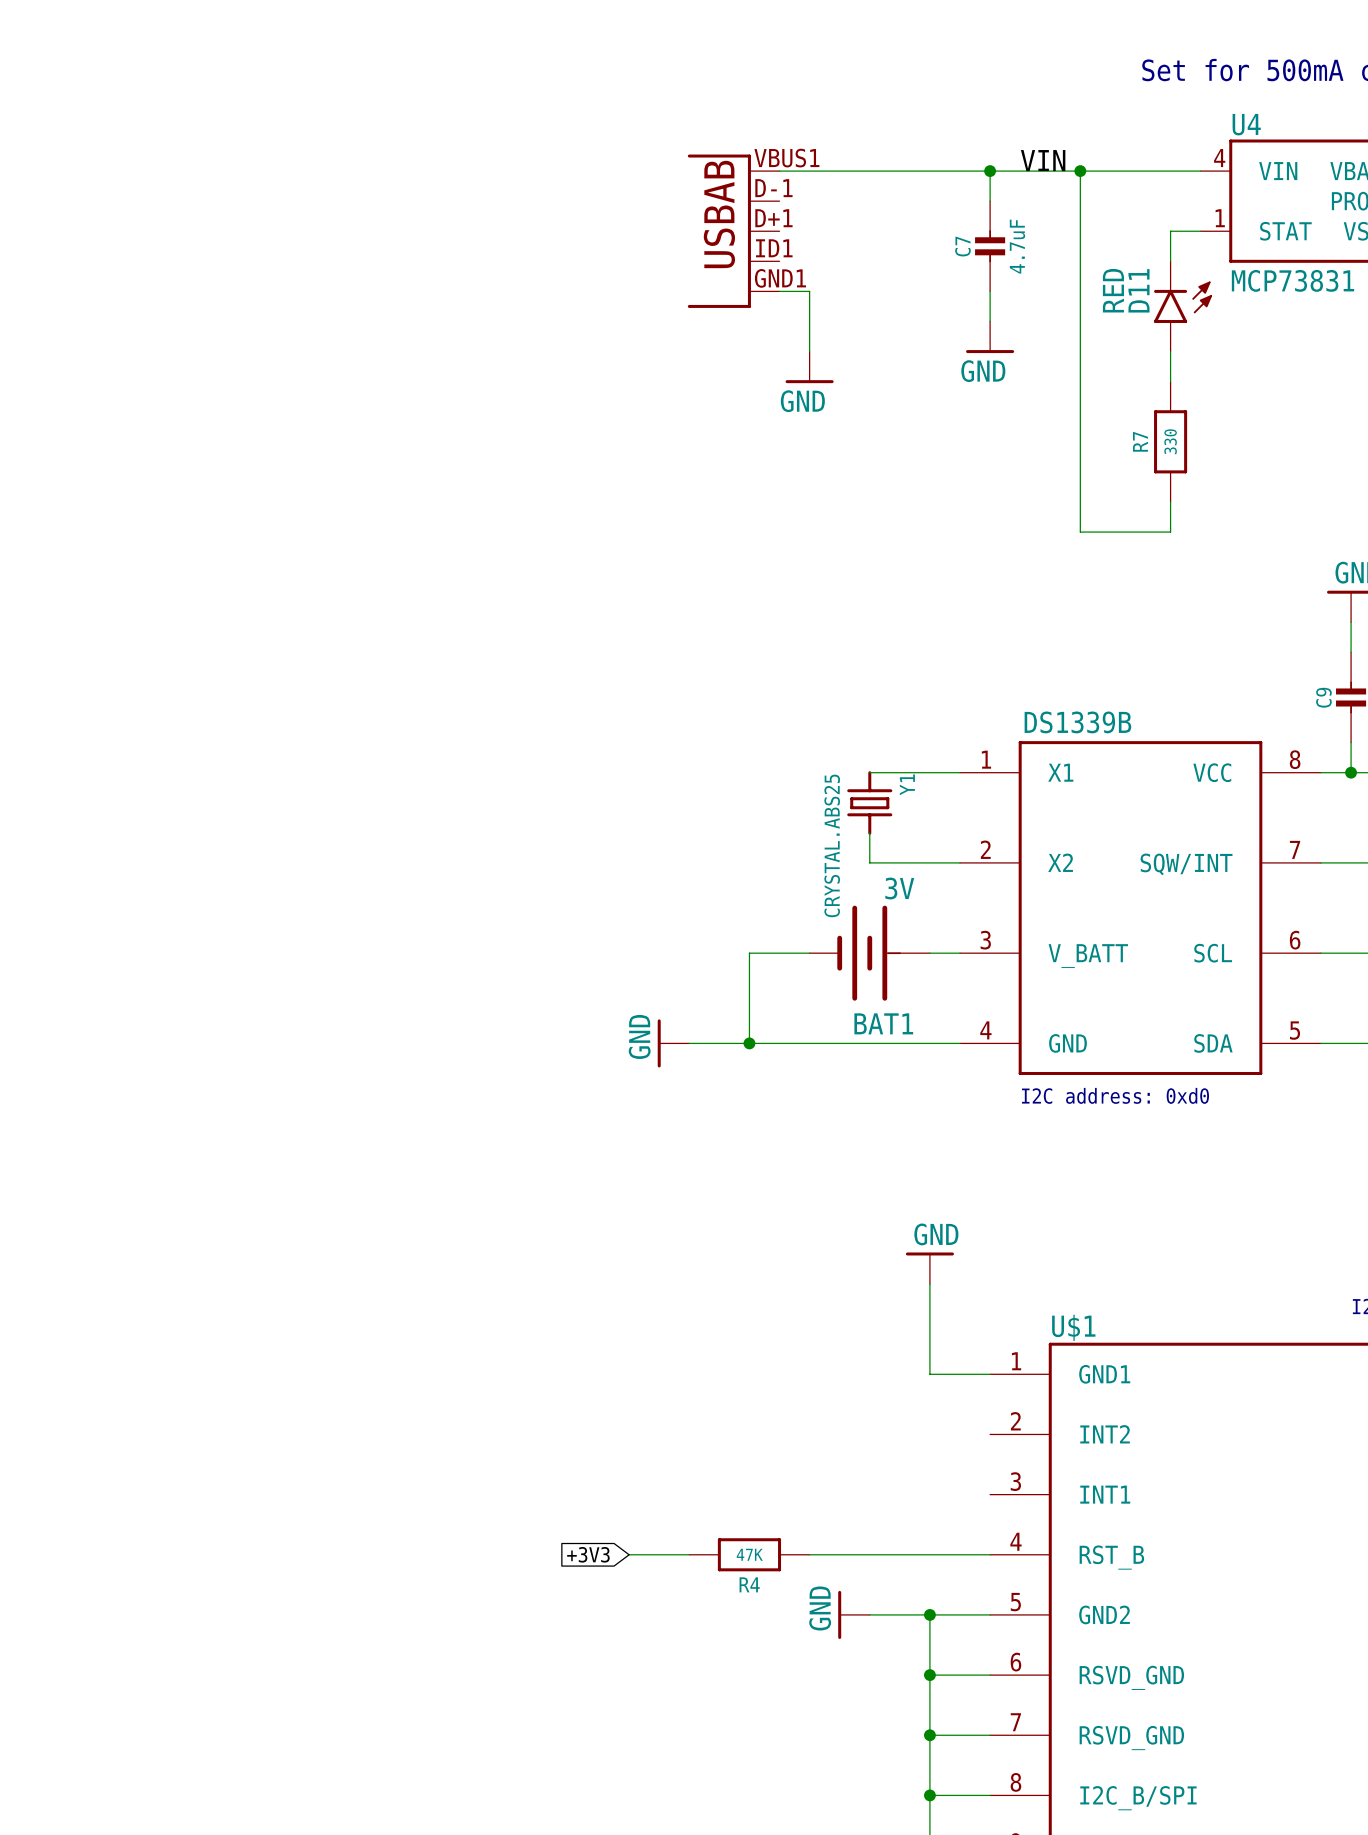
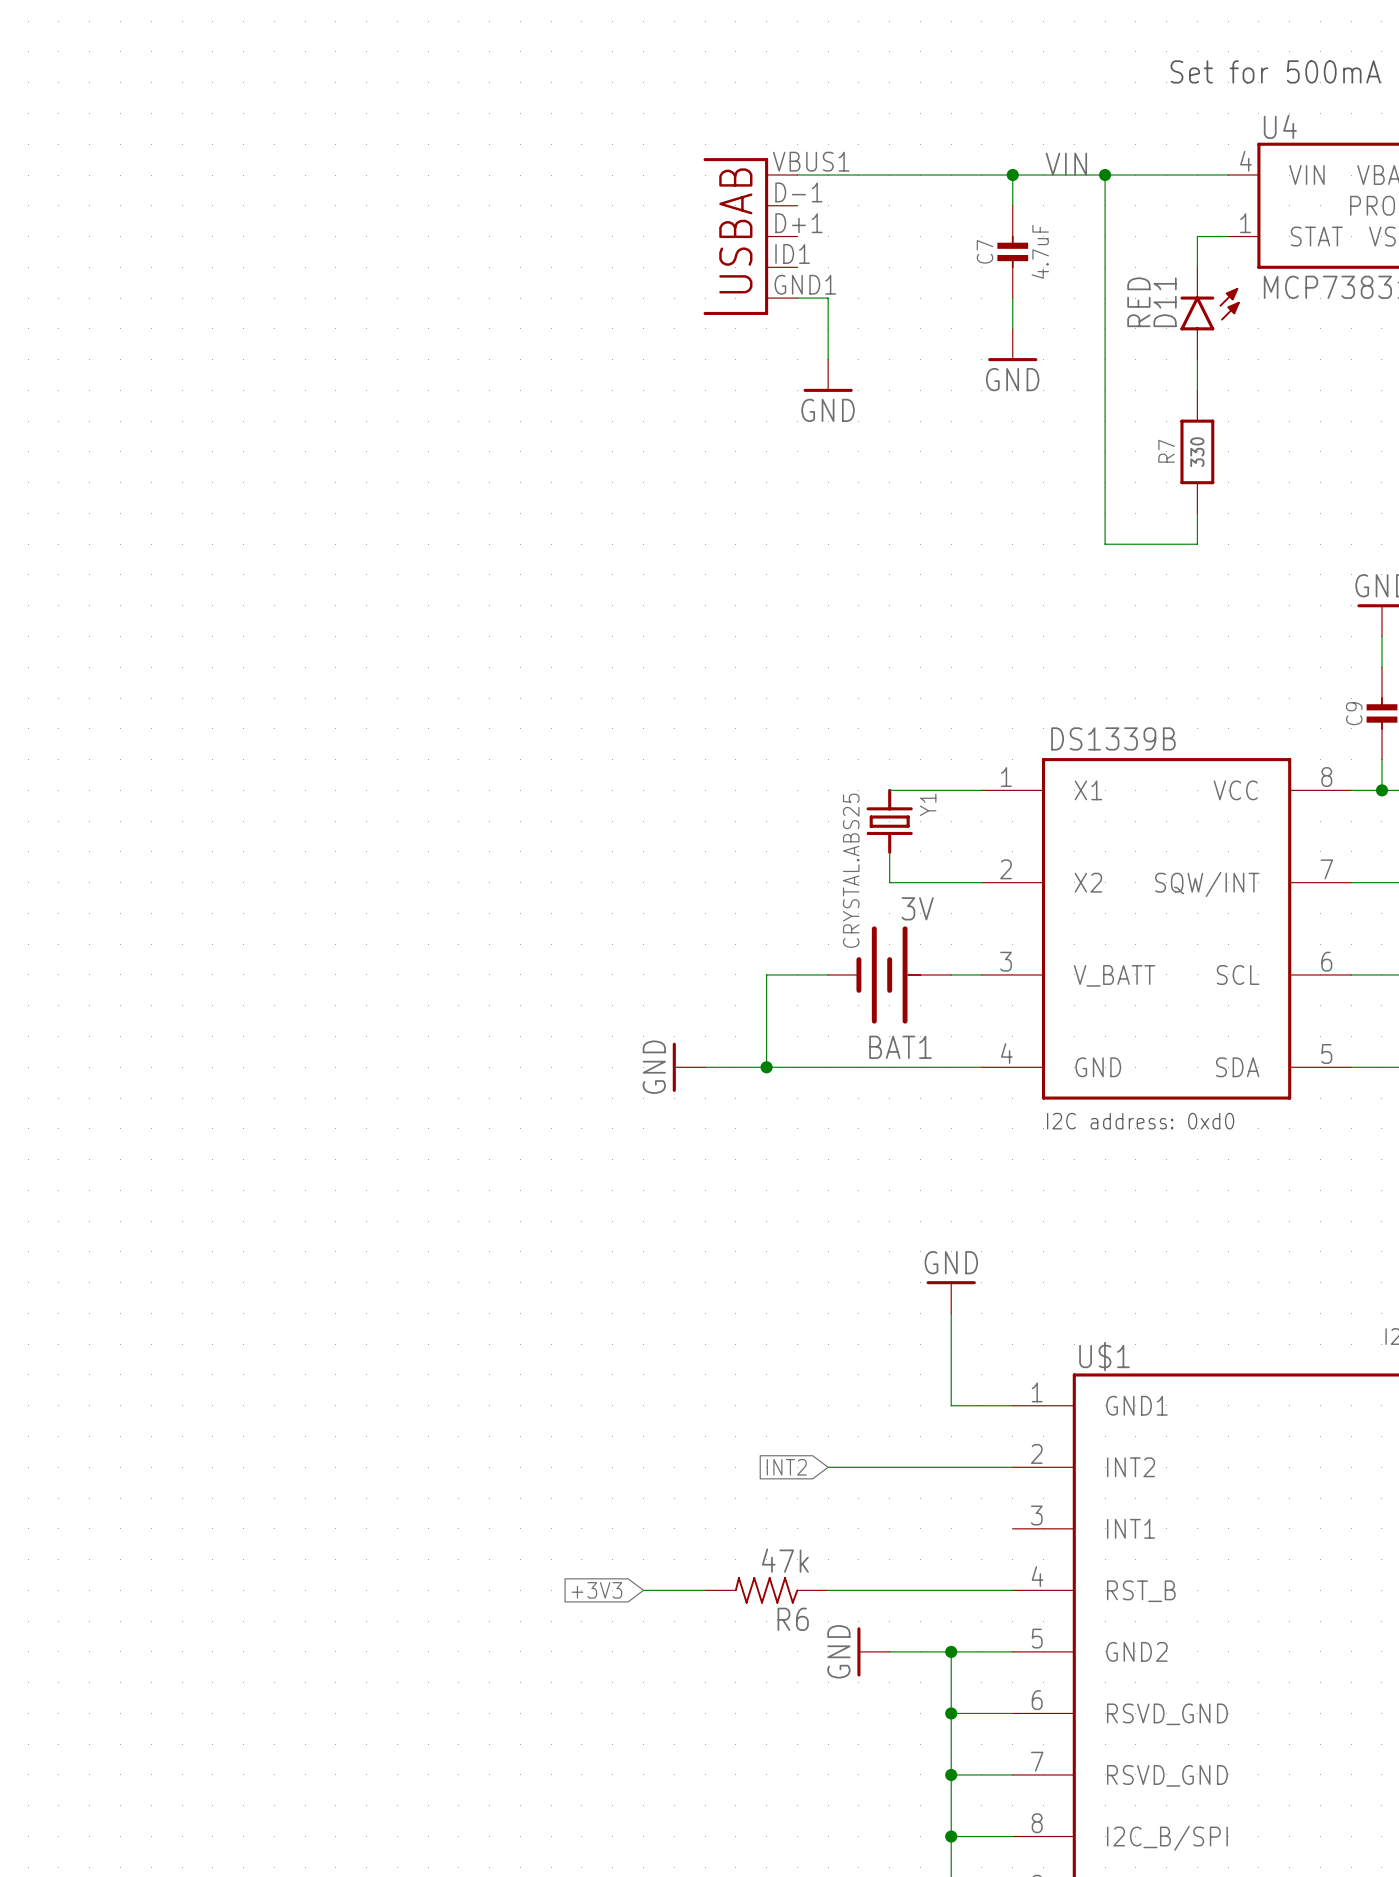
global label: none -> INT2 (786, 1467)
wire: none -> (828, 1467) (1012, 1467)
R4: 47K (749, 1554) -> none
R6: none -> 47k (766, 1590)

